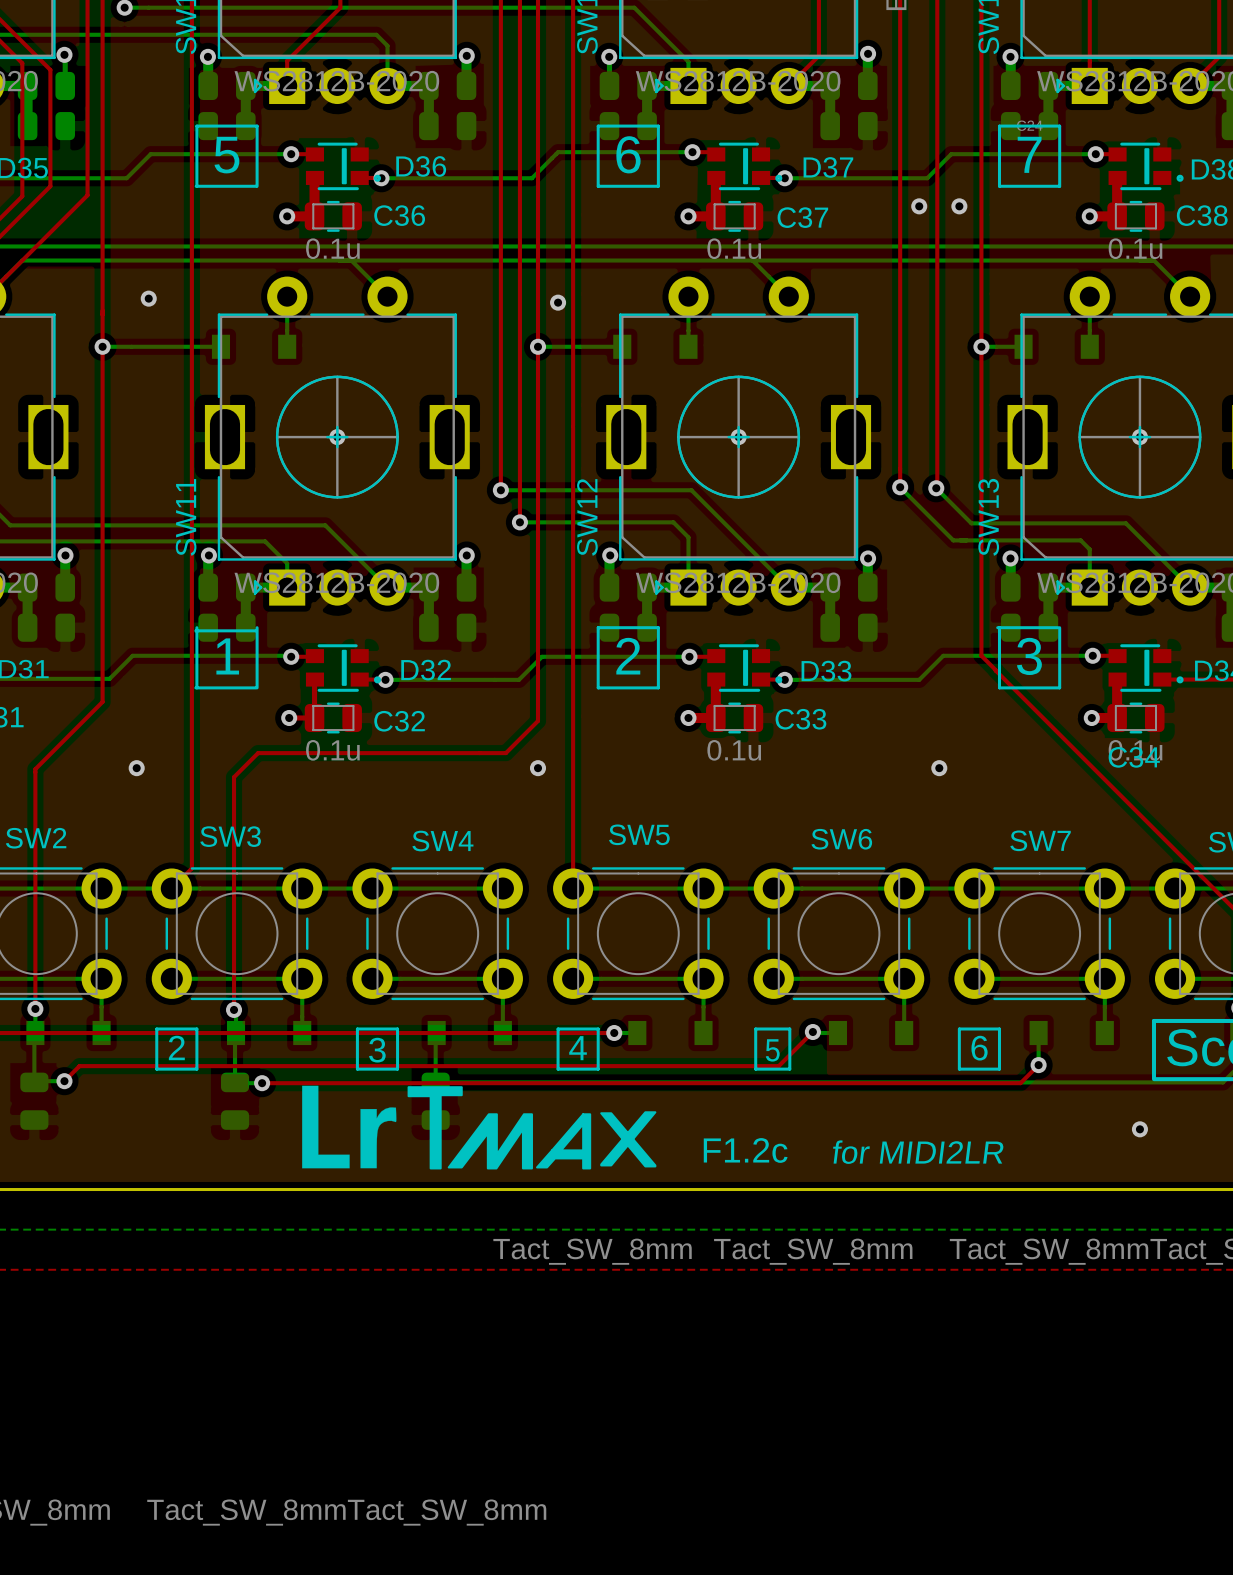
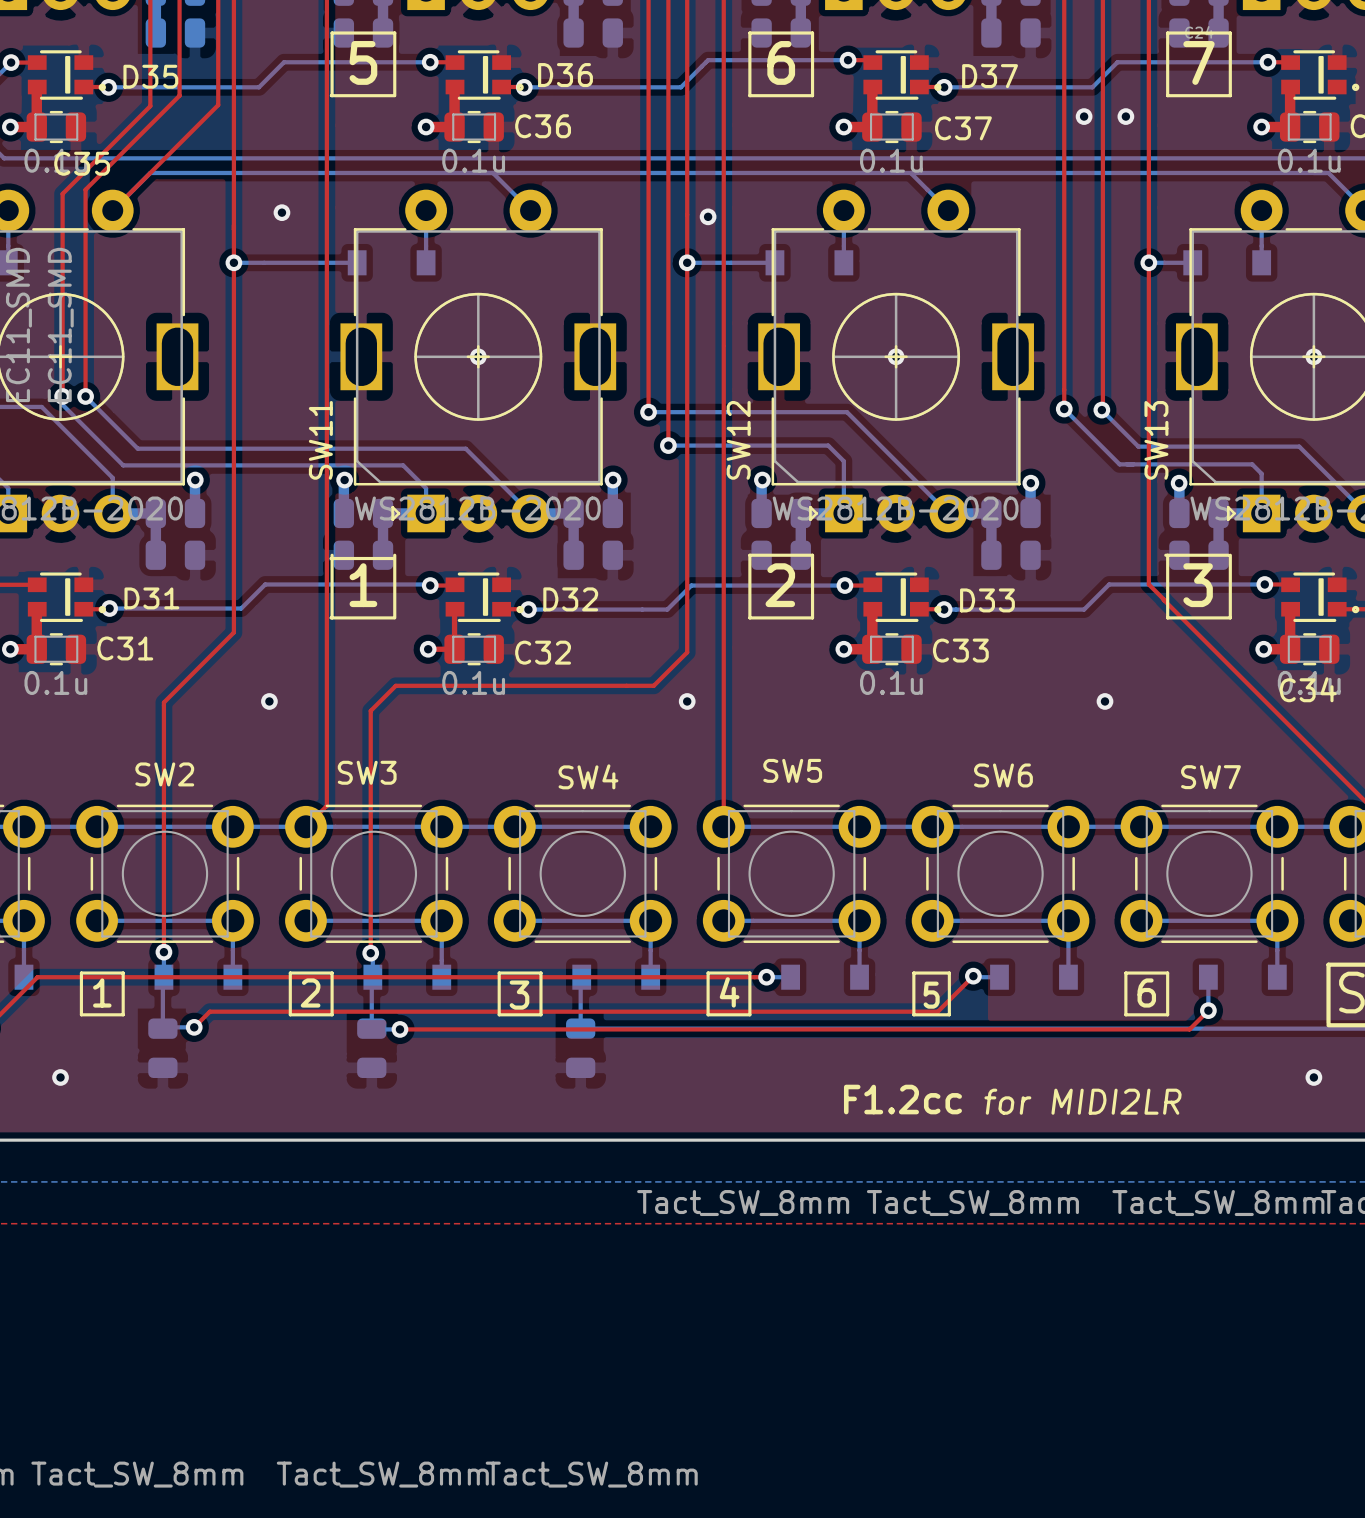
drawing: [302, 1085, 657, 1170] -> none
text: F1.2c (745, 1150) -> F1.2cc (902, 1099)

